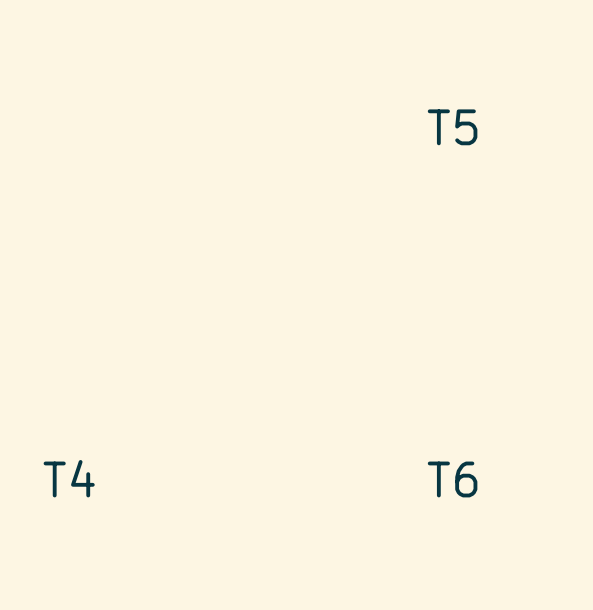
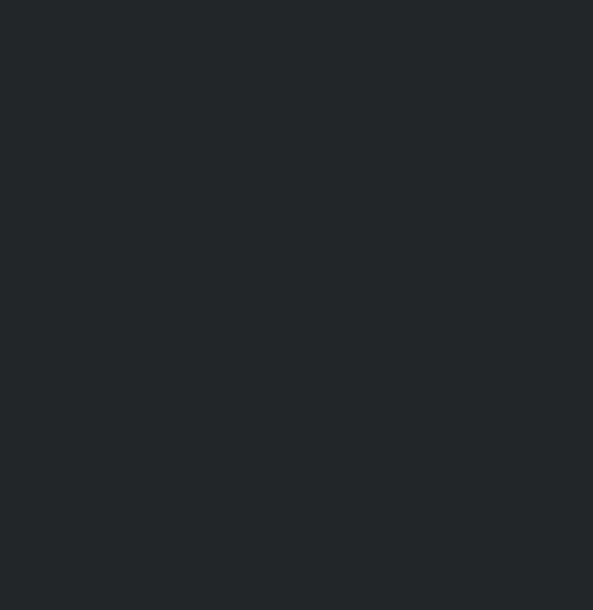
label: T5 (452, 127) -> none
label: T4 (69, 478) -> none
label: T6 (452, 479) -> none

